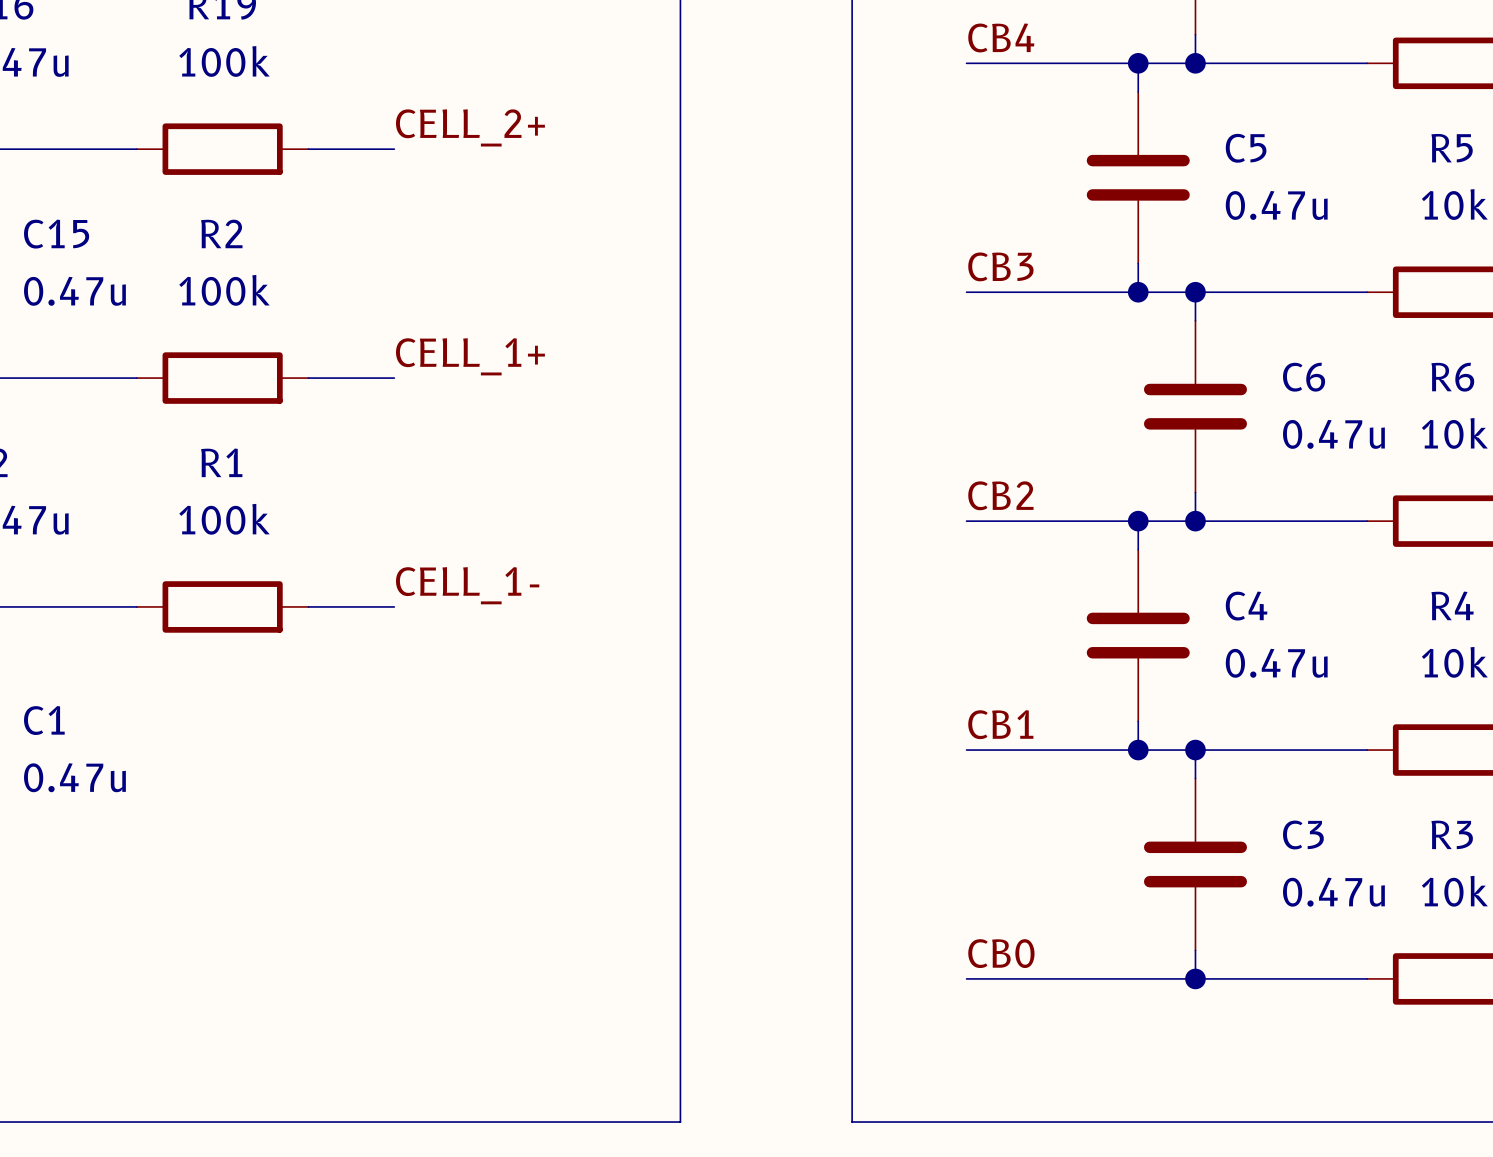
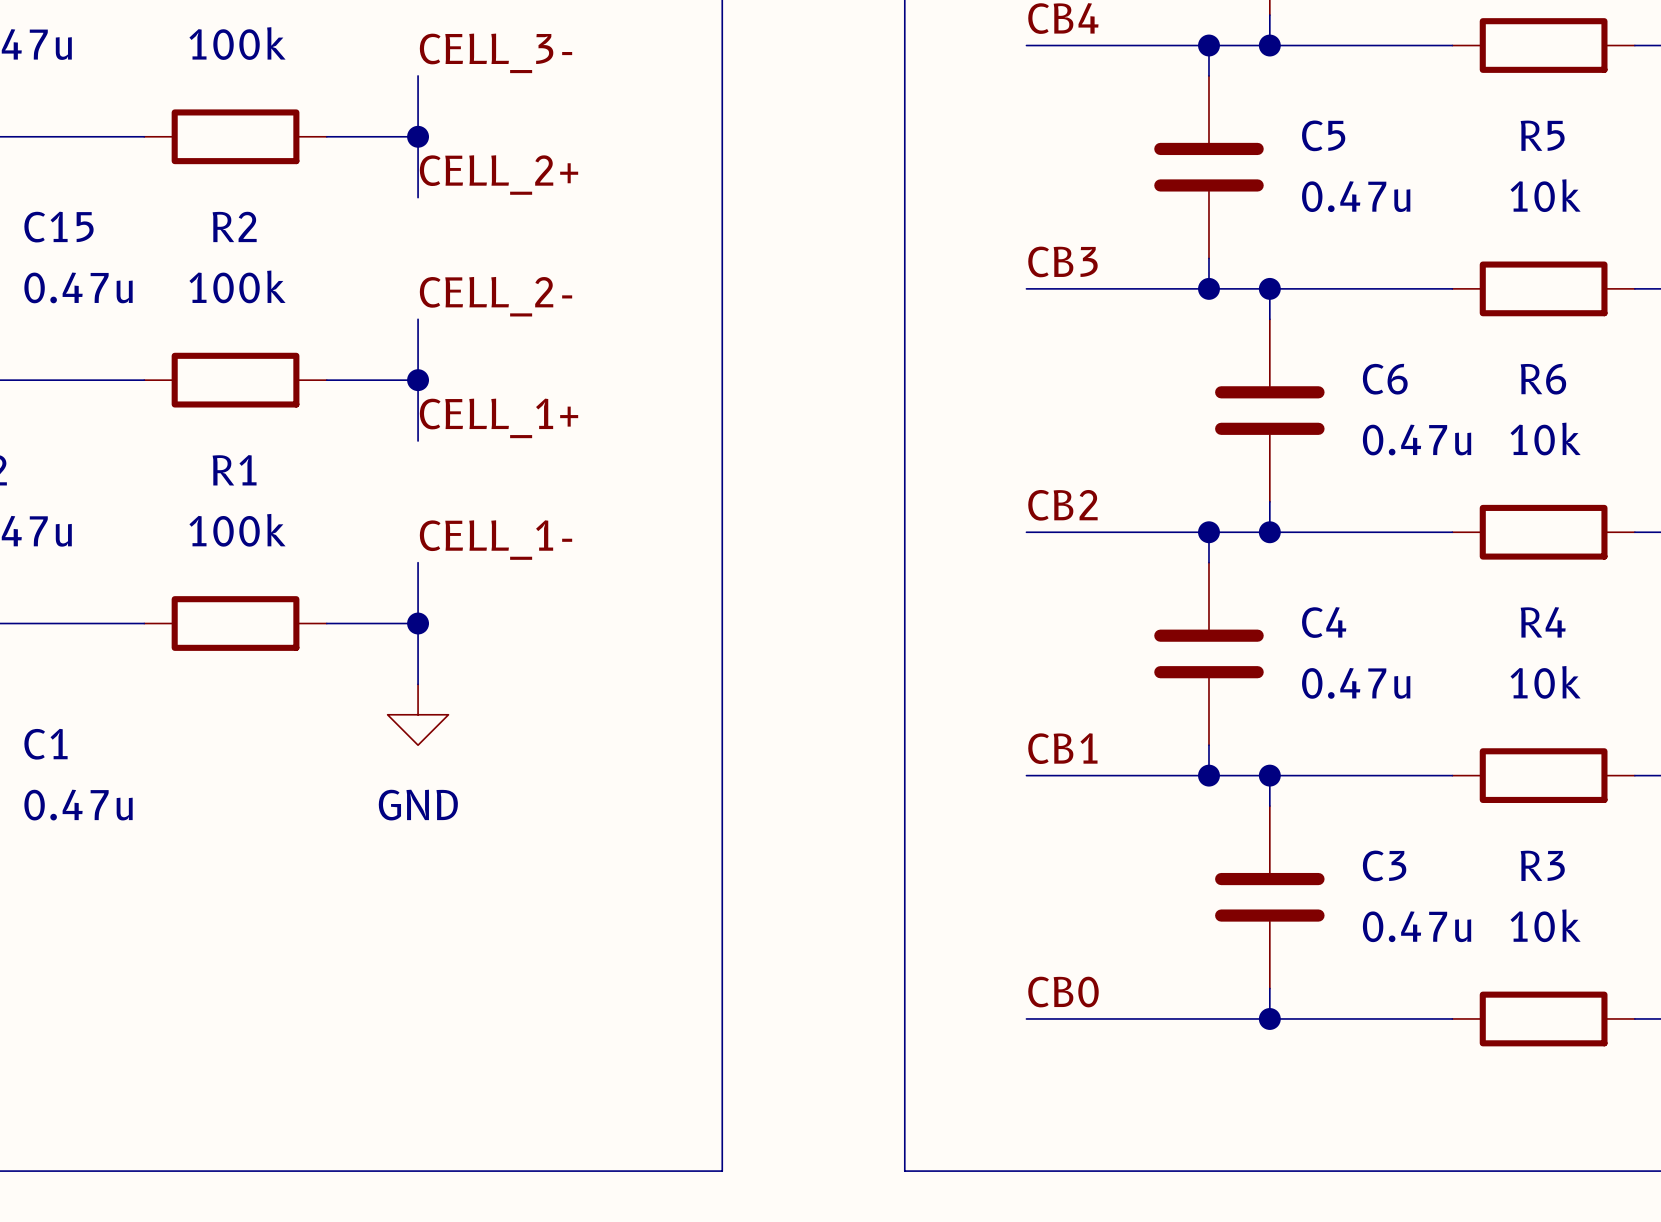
label: none -> CELL_3- (495, 53)
wire: none -> (418, 75) (418, 197)
label position: CELL_2+ (470, 127) -> CELL_2+ (499, 175)
junction: none -> (418, 136)
label: none -> CELL_2- (495, 296)
wire: none -> (418, 319) (418, 440)
label position: CELL_1+ (470, 356) -> CELL_1+ (499, 418)
junction: none -> (418, 380)
wire: none -> (418, 562) (418, 684)
label position: CELL_1- (467, 585) -> CELL_1- (495, 540)
junction: none -> (418, 623)
power symbol: none -> GND (418, 714)

